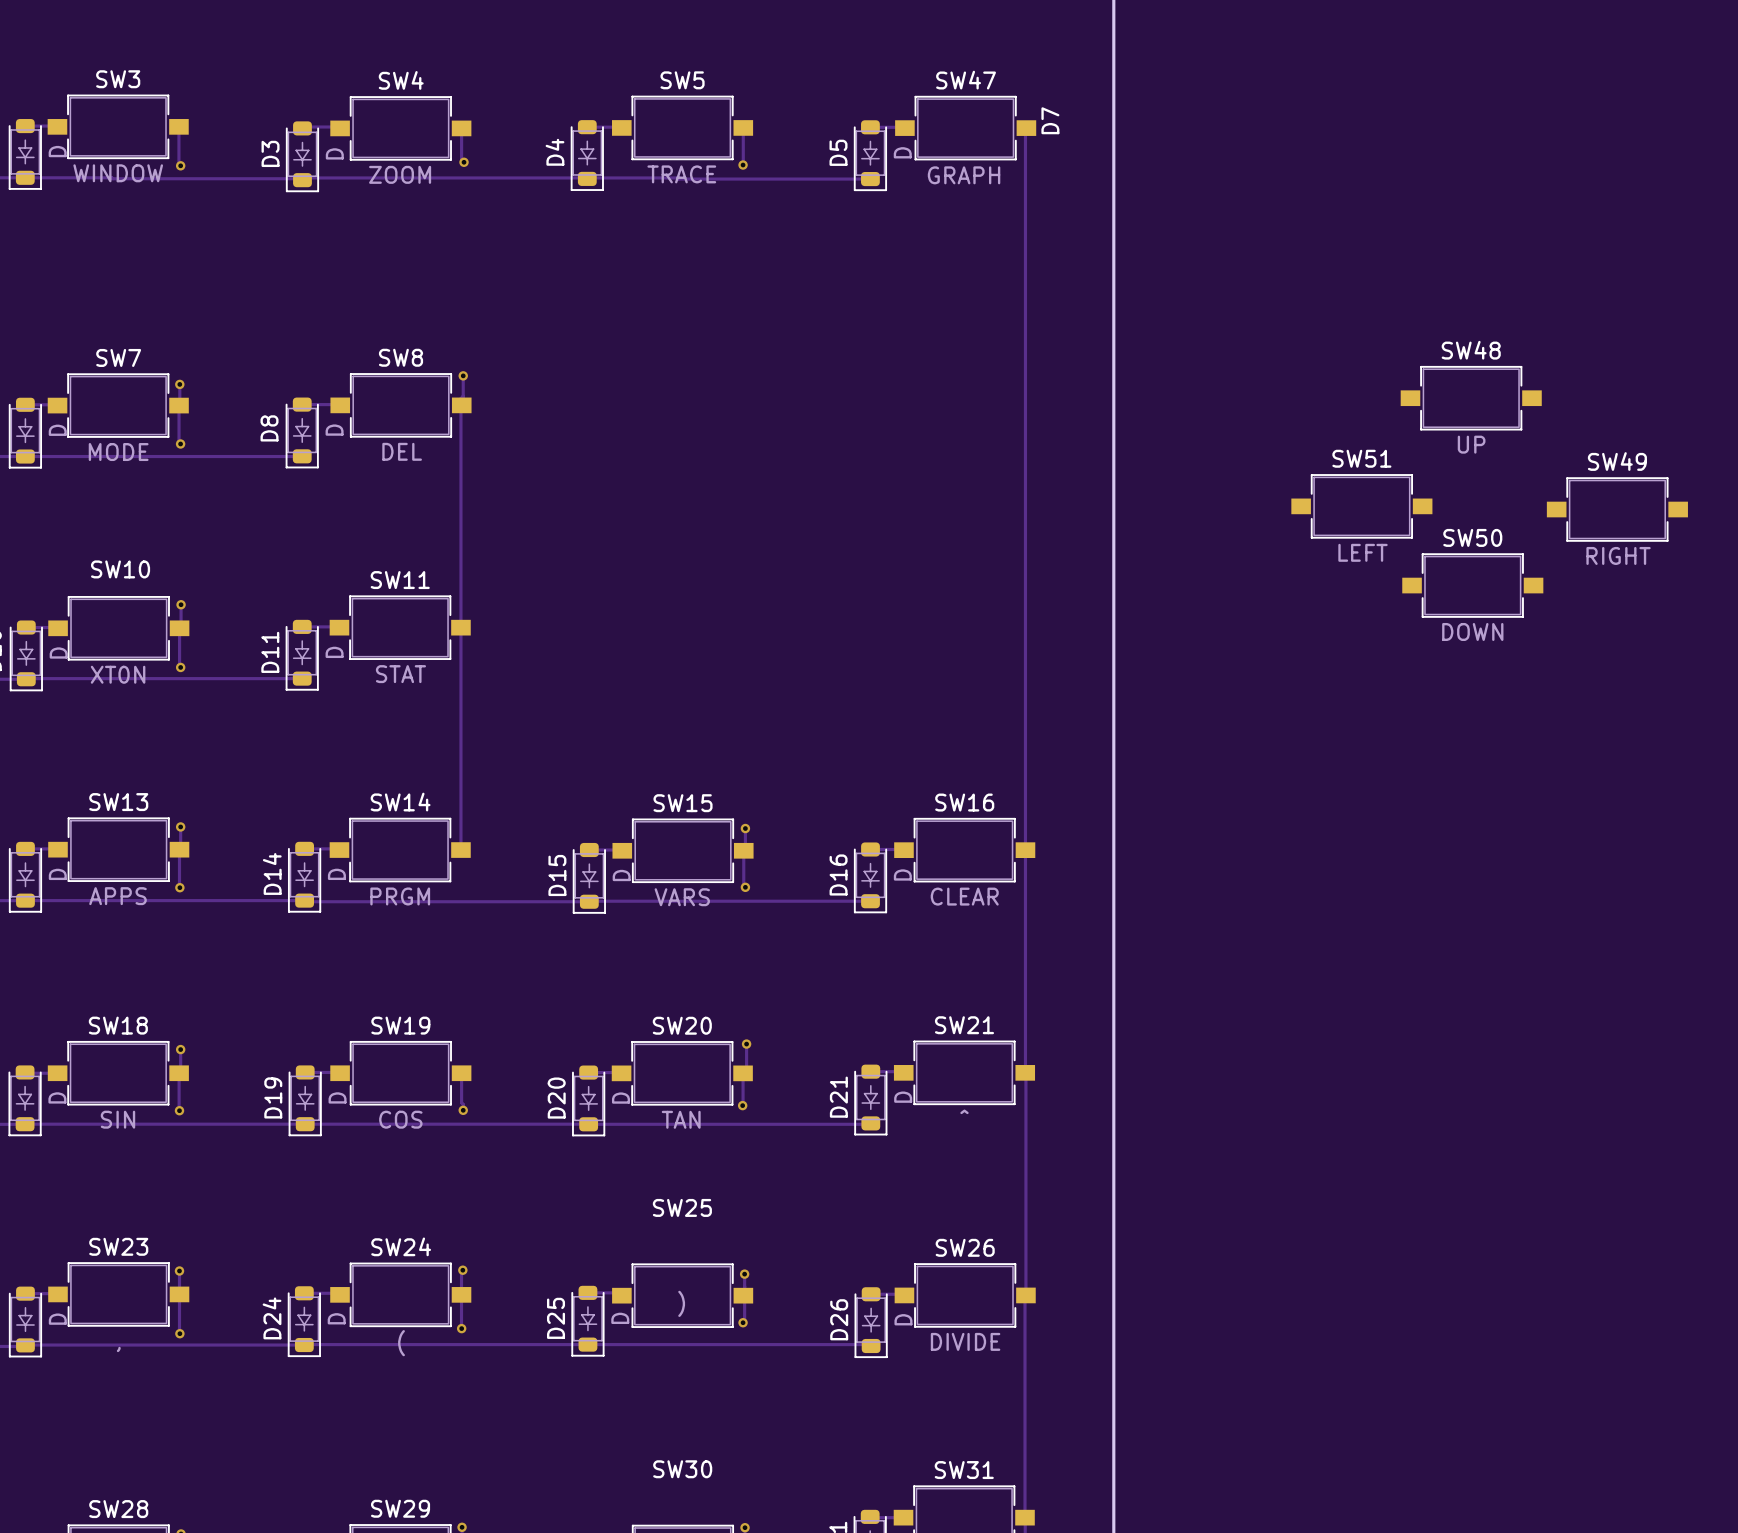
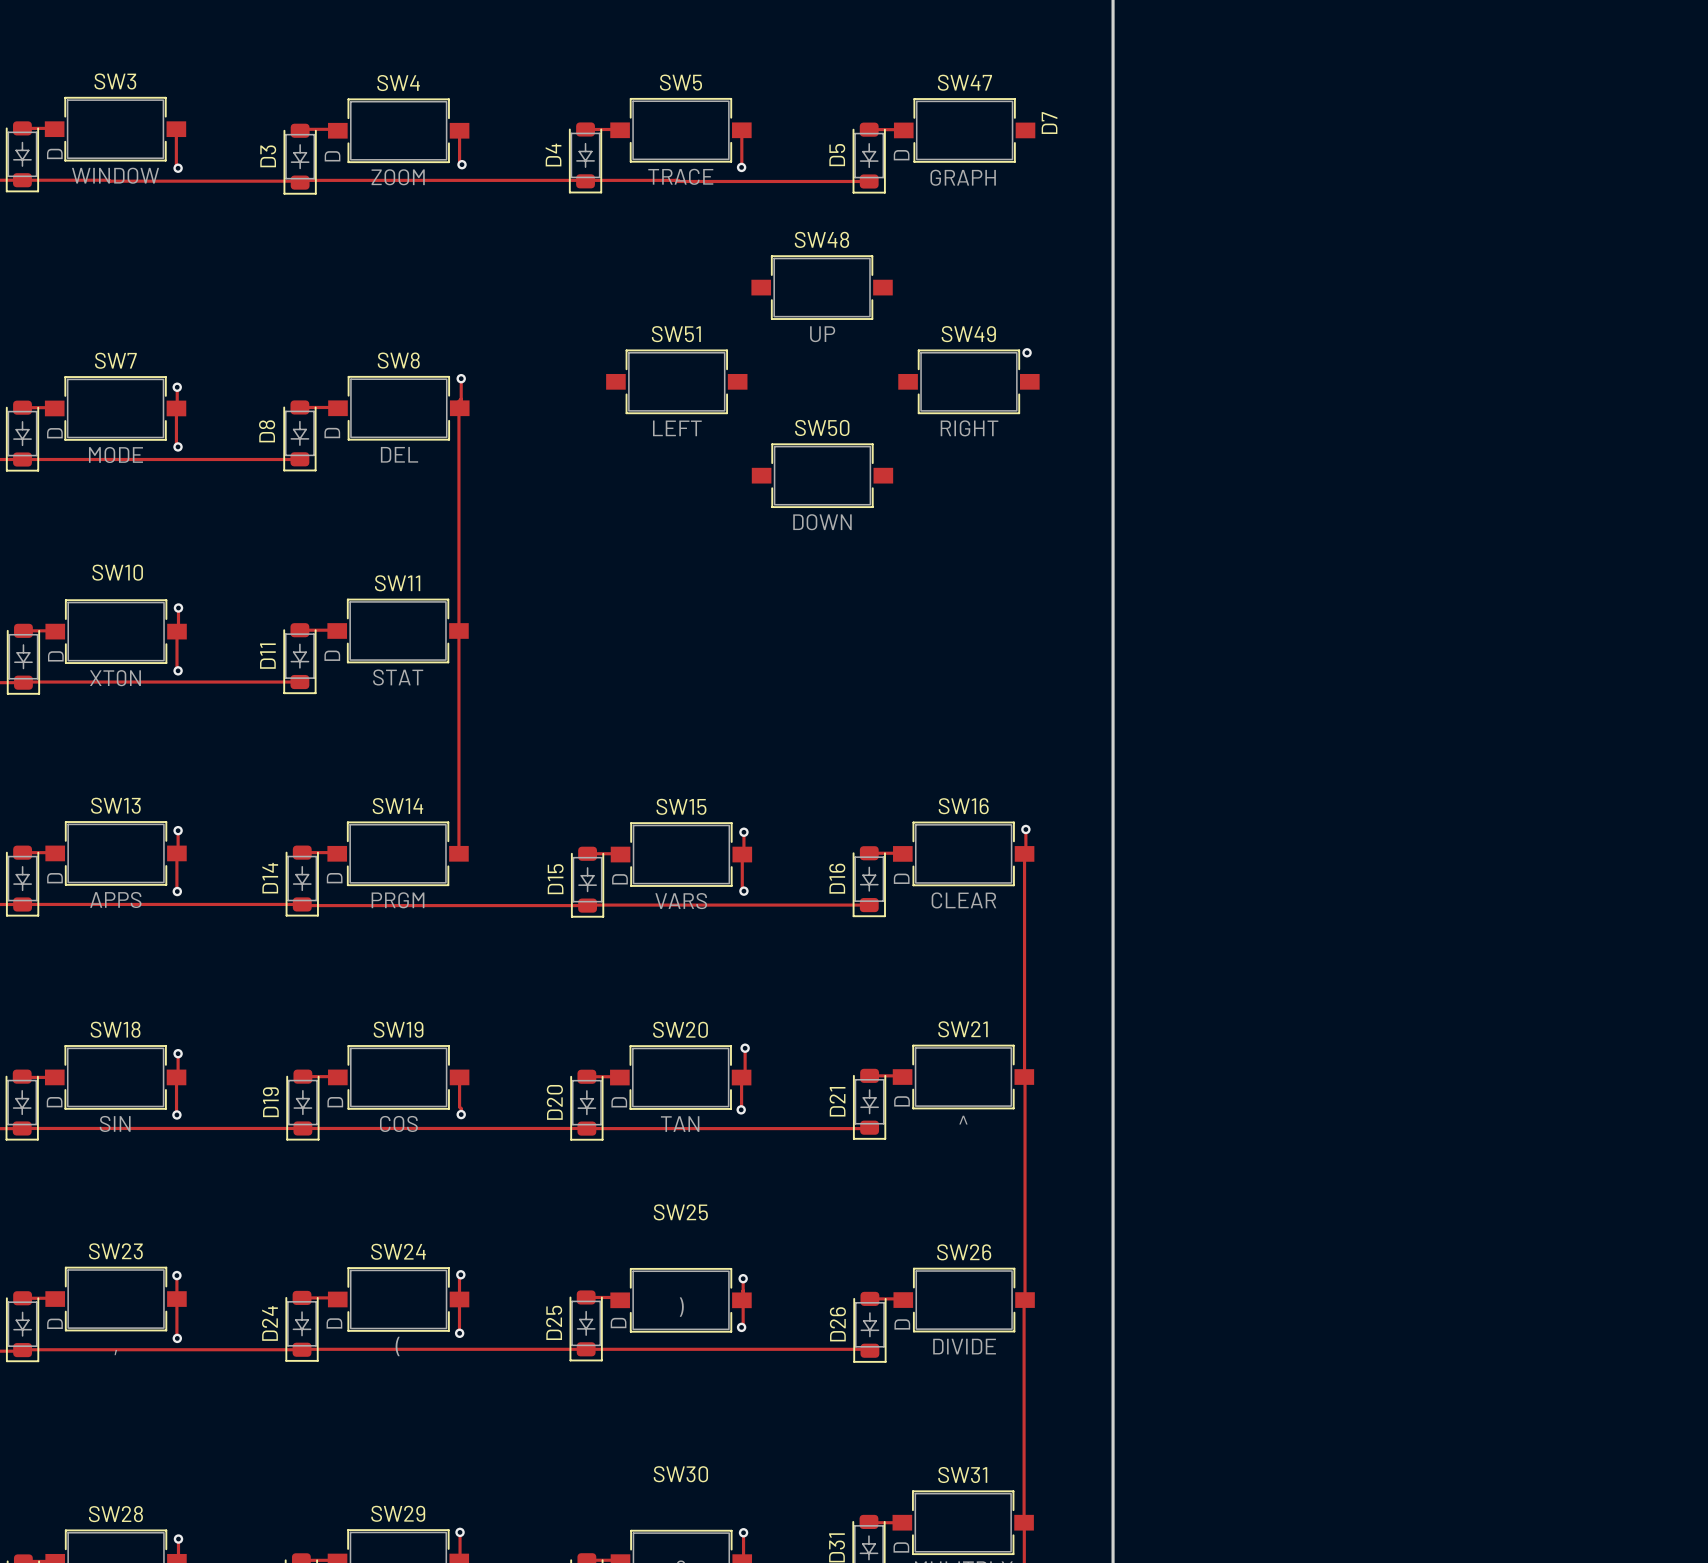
track: (1025, 129) (1025, 850) -> (1025, 829) (1024, 853)
via: none -> (1027, 352)
SW48 position: (1471, 398) -> (822, 287)
SW51 position: (1361, 506) -> (676, 381)
SW49 position: (1617, 509) -> (968, 381)
SW50 position: (1472, 585) -> (822, 475)
via: none -> (1025, 829)

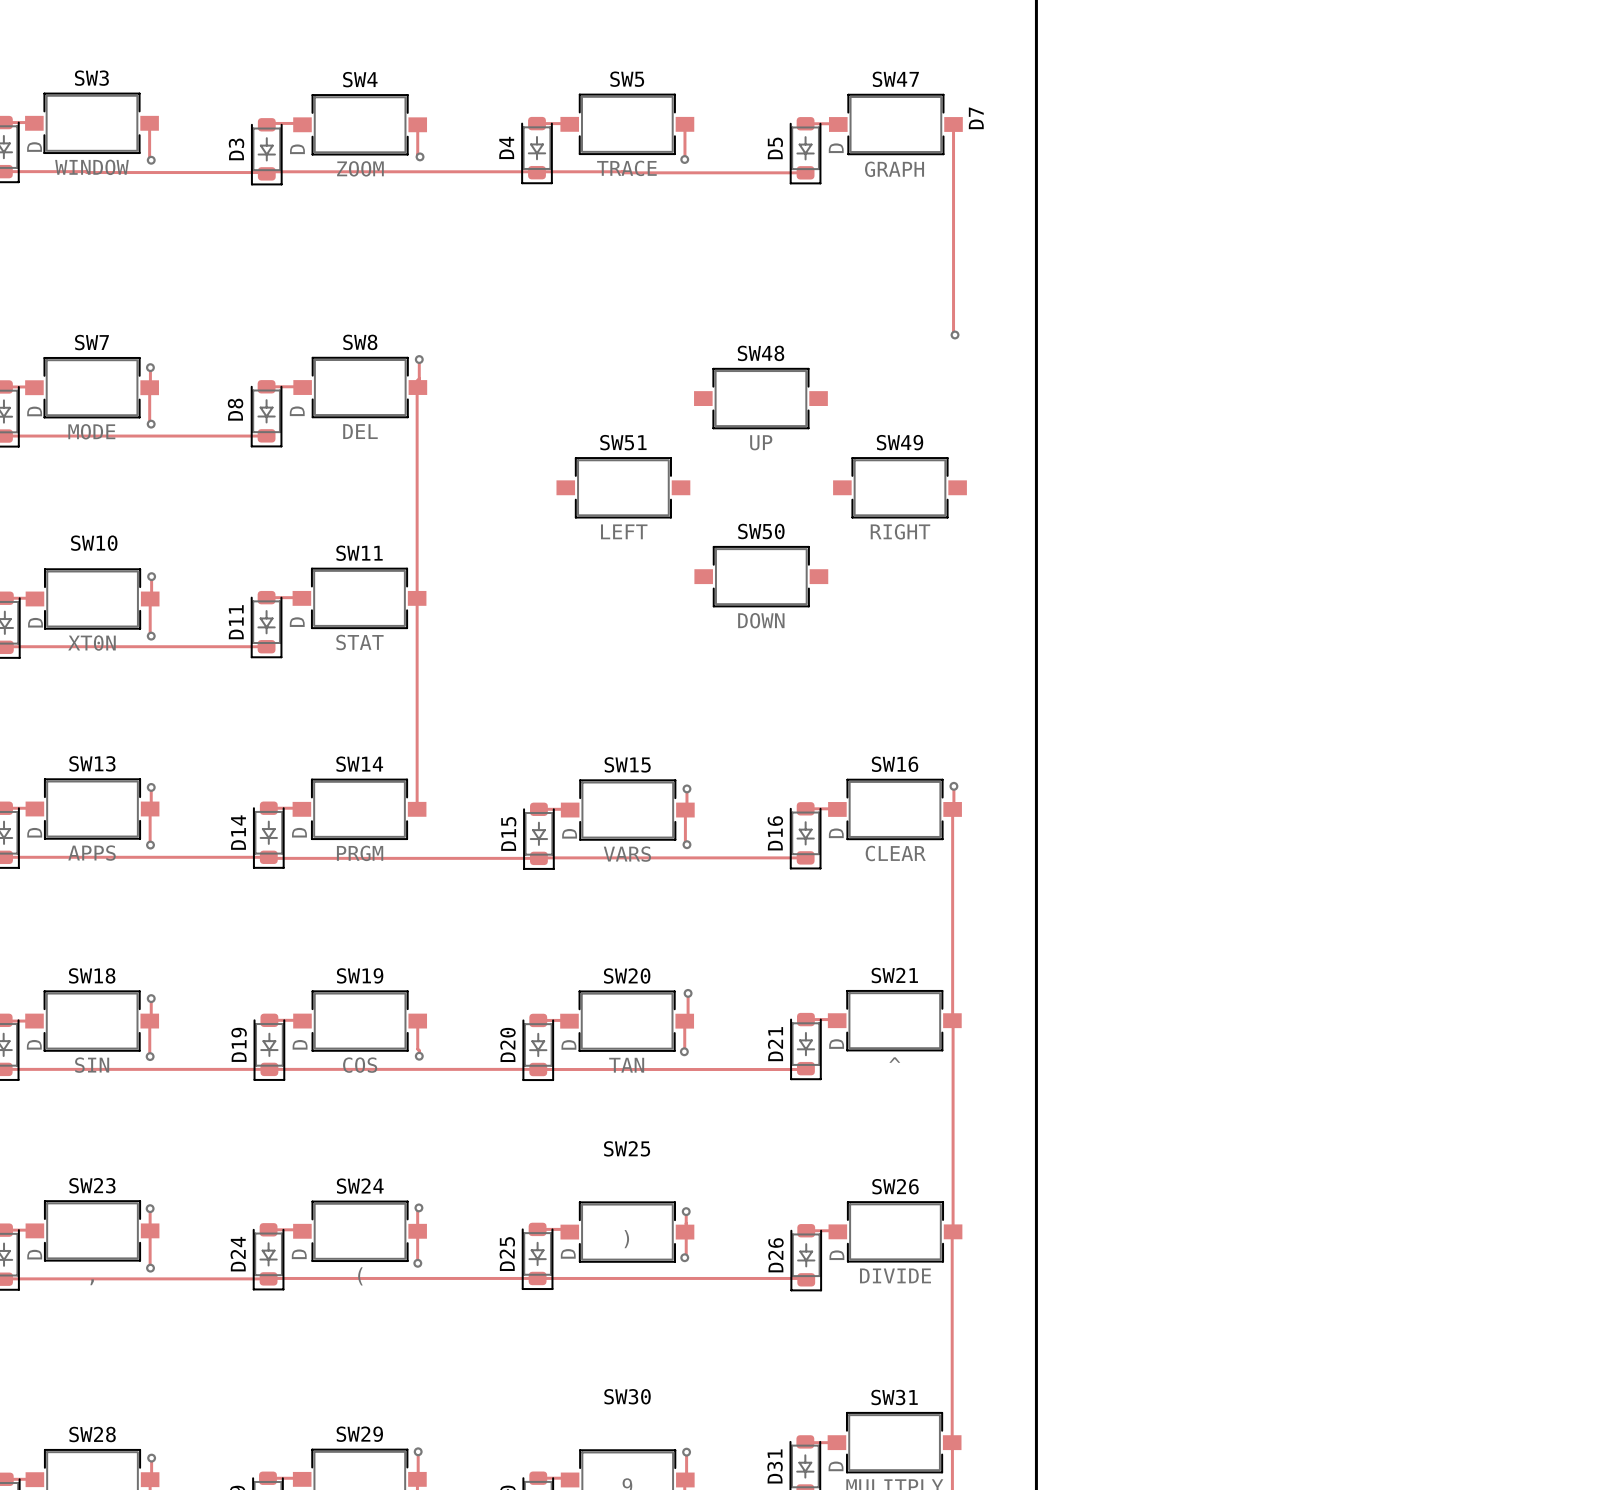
track: none -> (953, 124) (955, 334)
SW48 position: (822, 287) -> (760, 398)
SW51 position: (676, 381) -> (623, 487)
SW49 position: (968, 381) -> (899, 487)
SW50 position: (822, 475) -> (761, 576)

